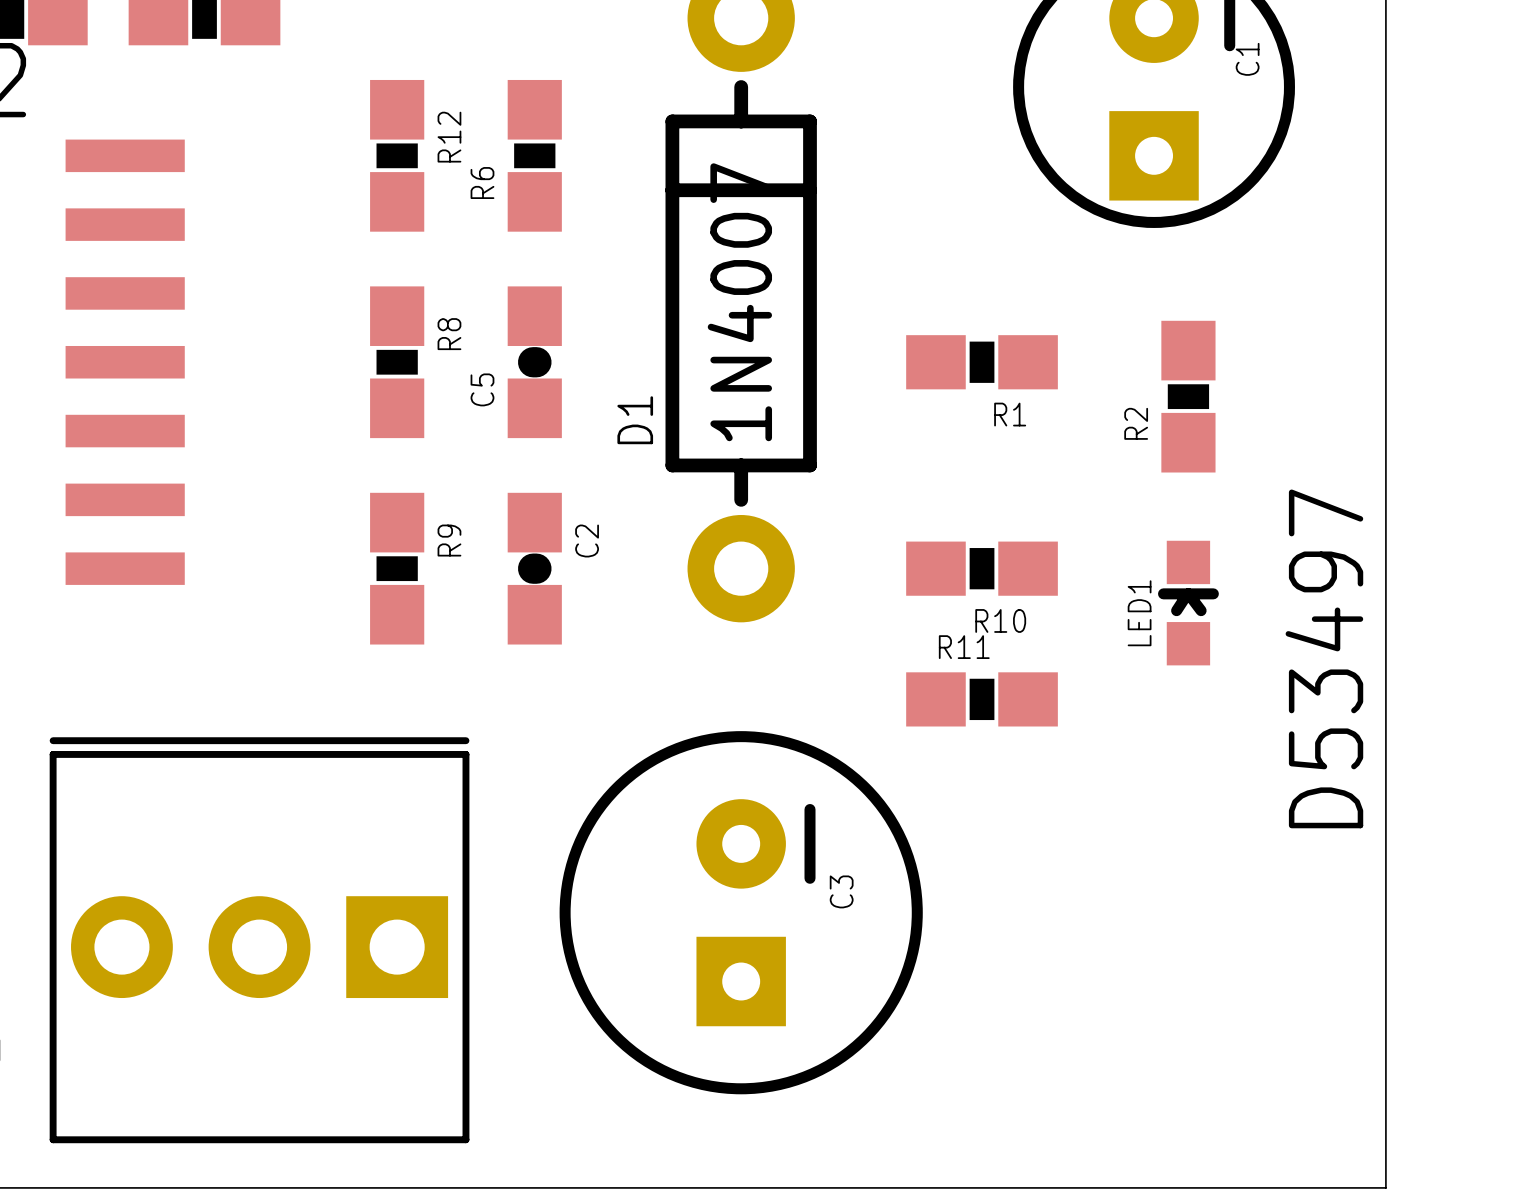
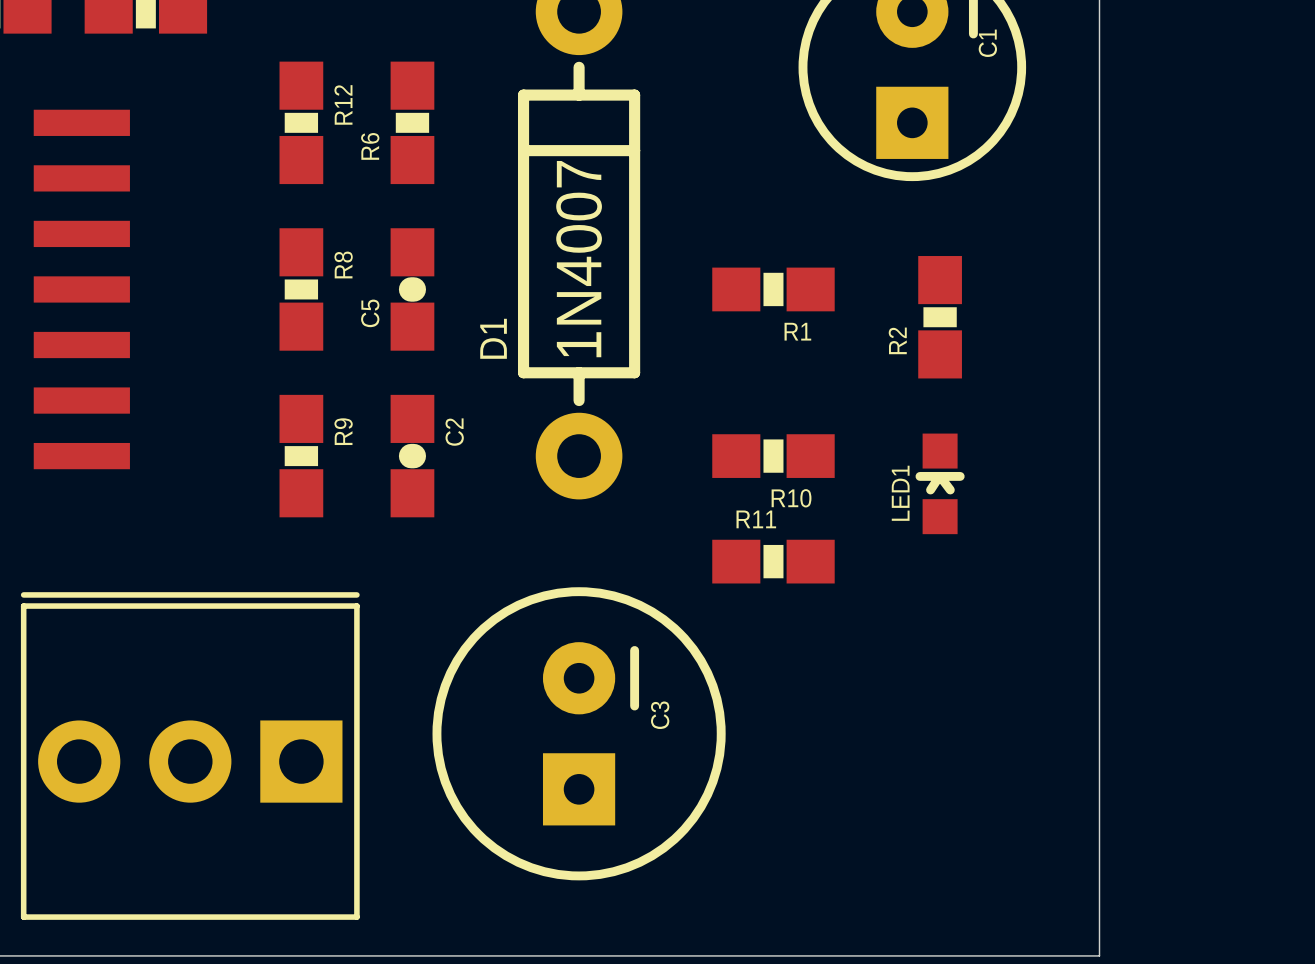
text: D53497 (1324, 658) -> none

